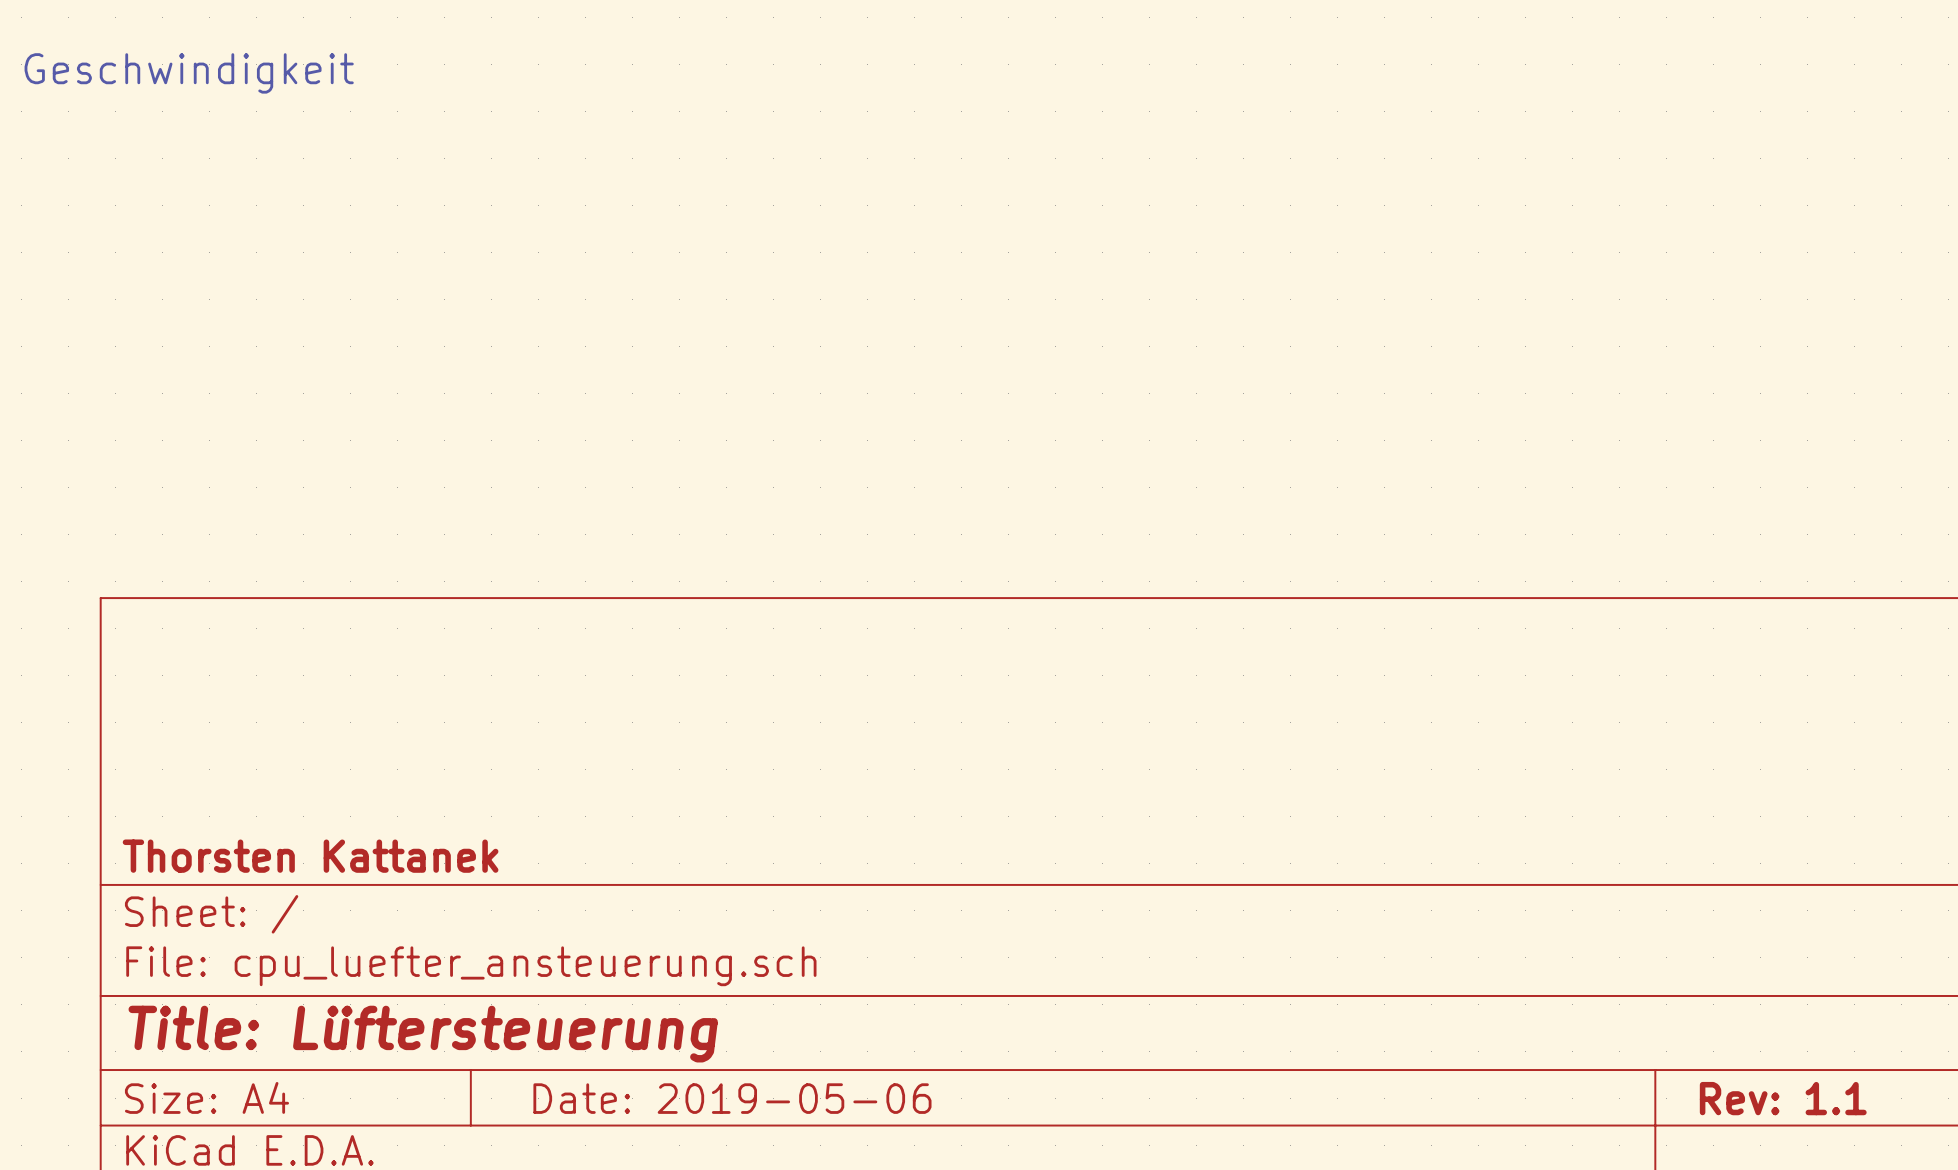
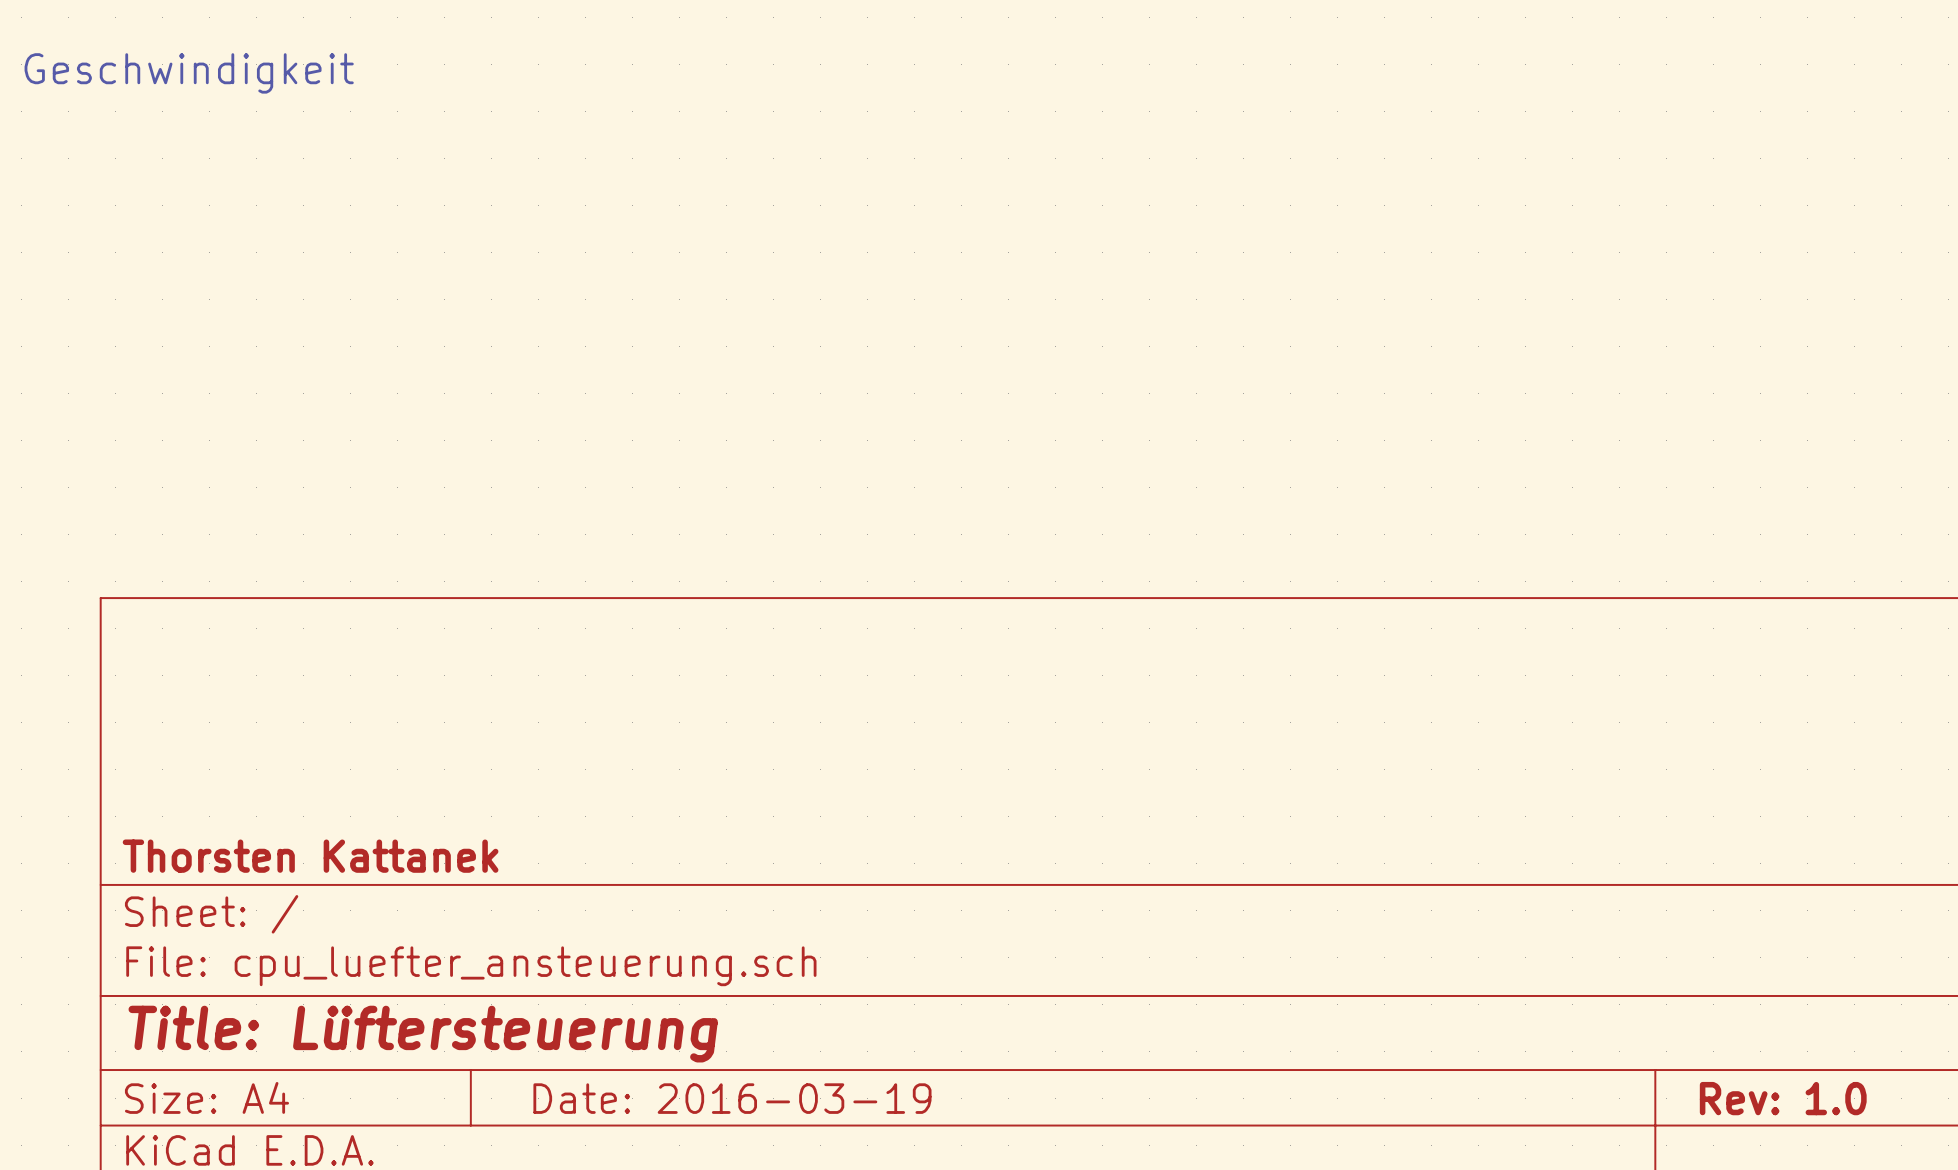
title block: Date: 2019-05-06 (732, 1098) -> Date: 2016-03-19 (732, 1098)
title block: Rev: 1.1 (1783, 1098) -> Rev: 1.0 (1783, 1098)

